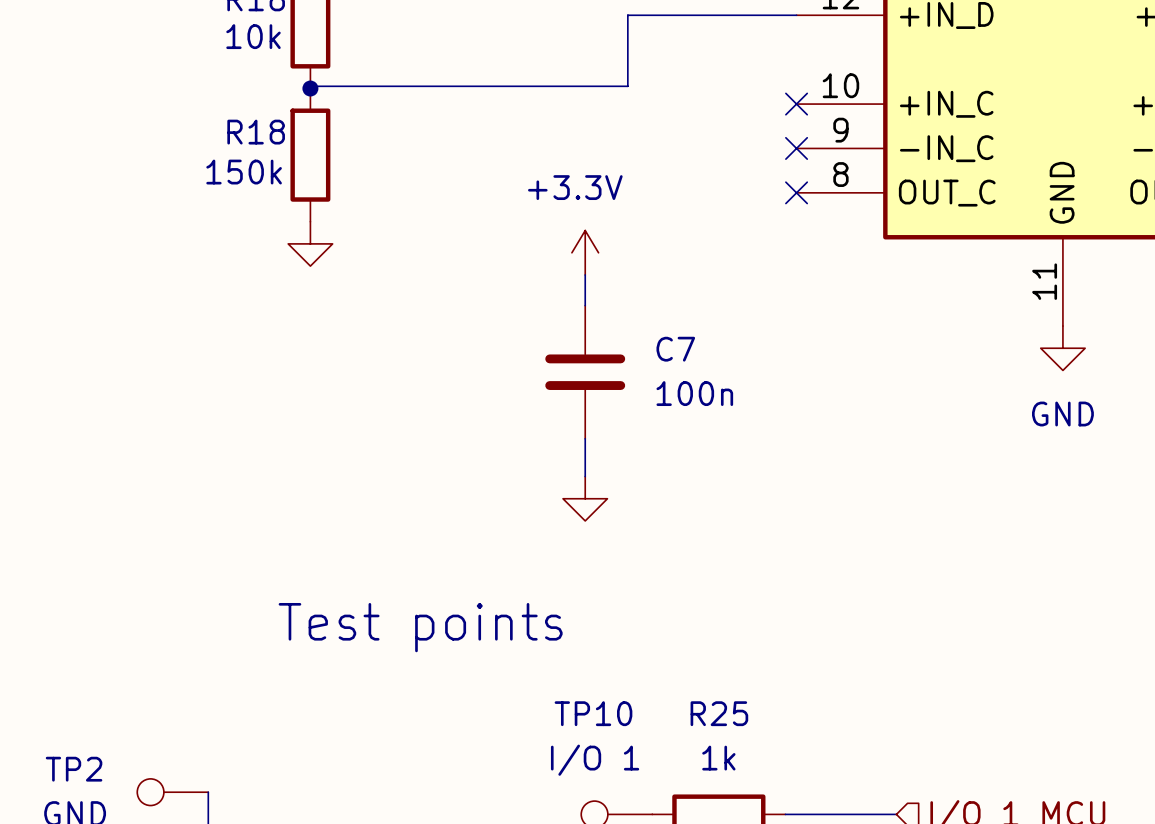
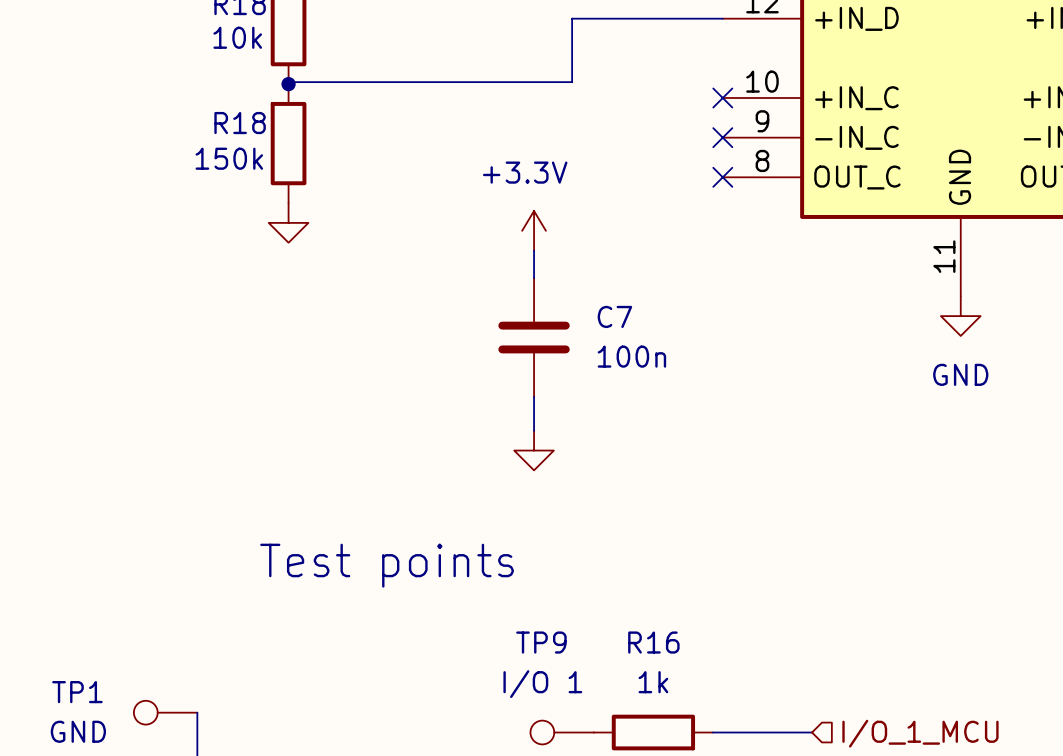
TP10 name: TP10 (593, 713) -> TP9 (541, 642)
R25 name: R25 (719, 713) -> R16 (653, 642)
TP2 name: TP2 (74, 769) -> TP1 (77, 692)

